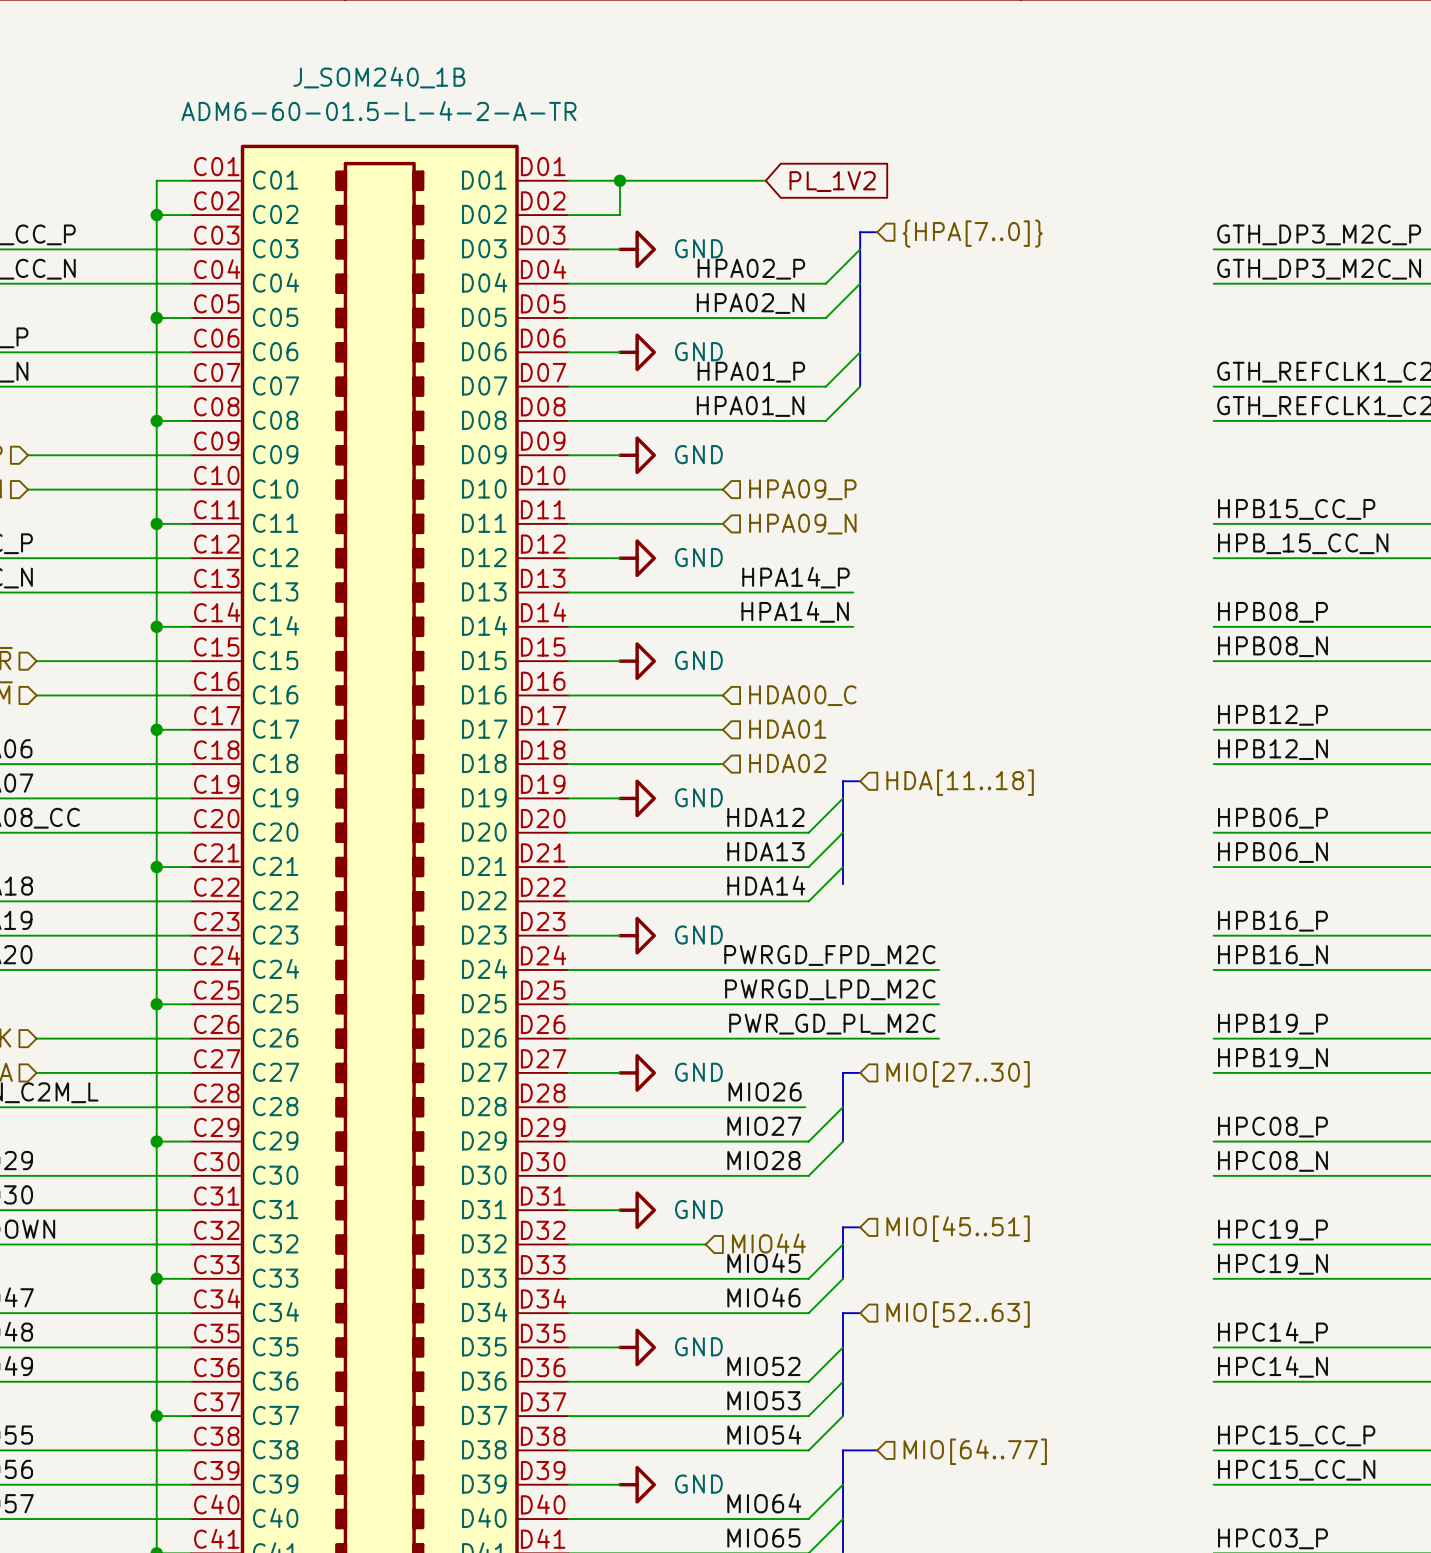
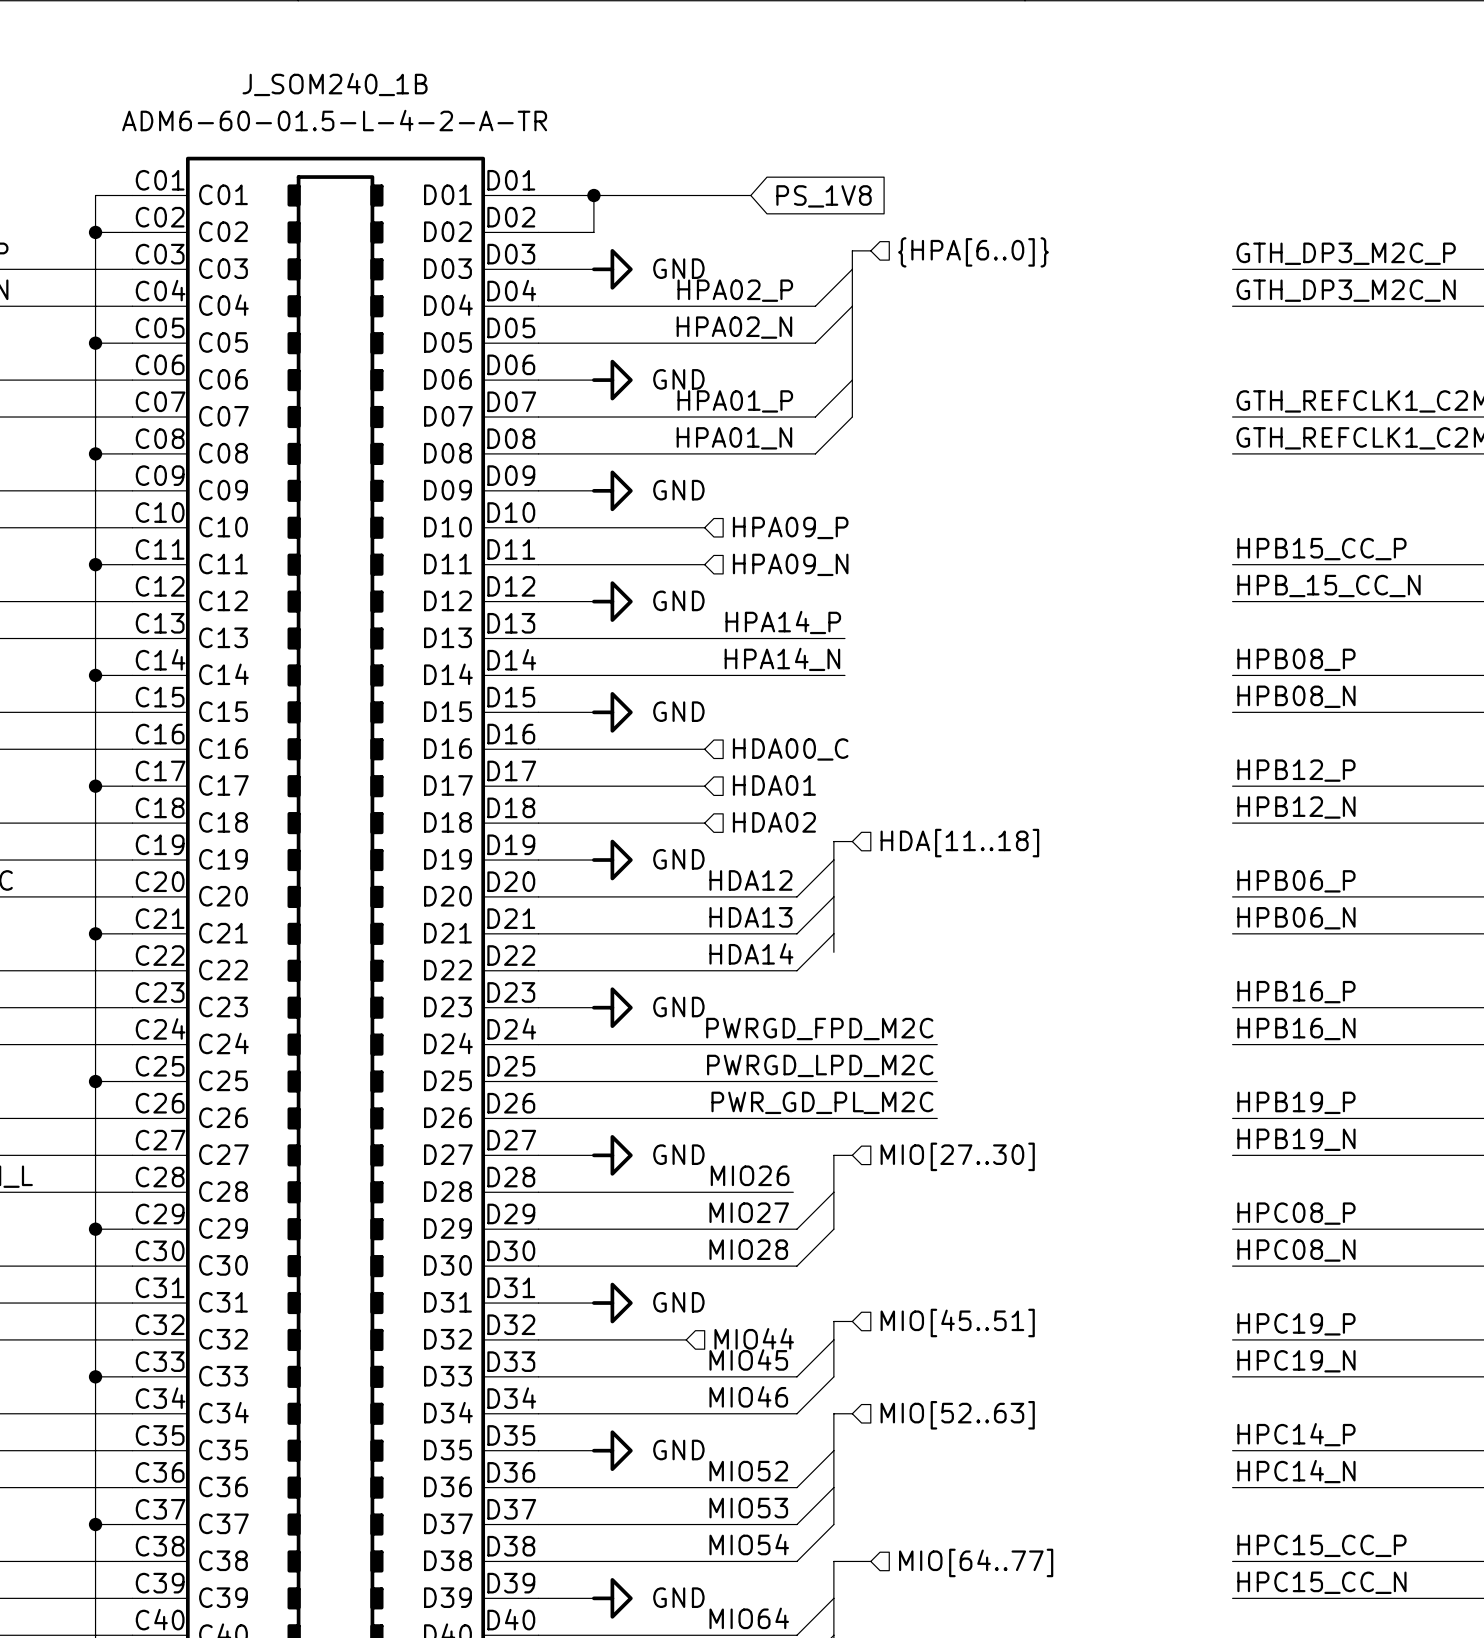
global label: PL_1V2 (832, 181) -> PS_1V8 (824, 196)
hierarchical label: {HPA[7..0]} (972, 233) -> {HPA[6..0]} (973, 252)

